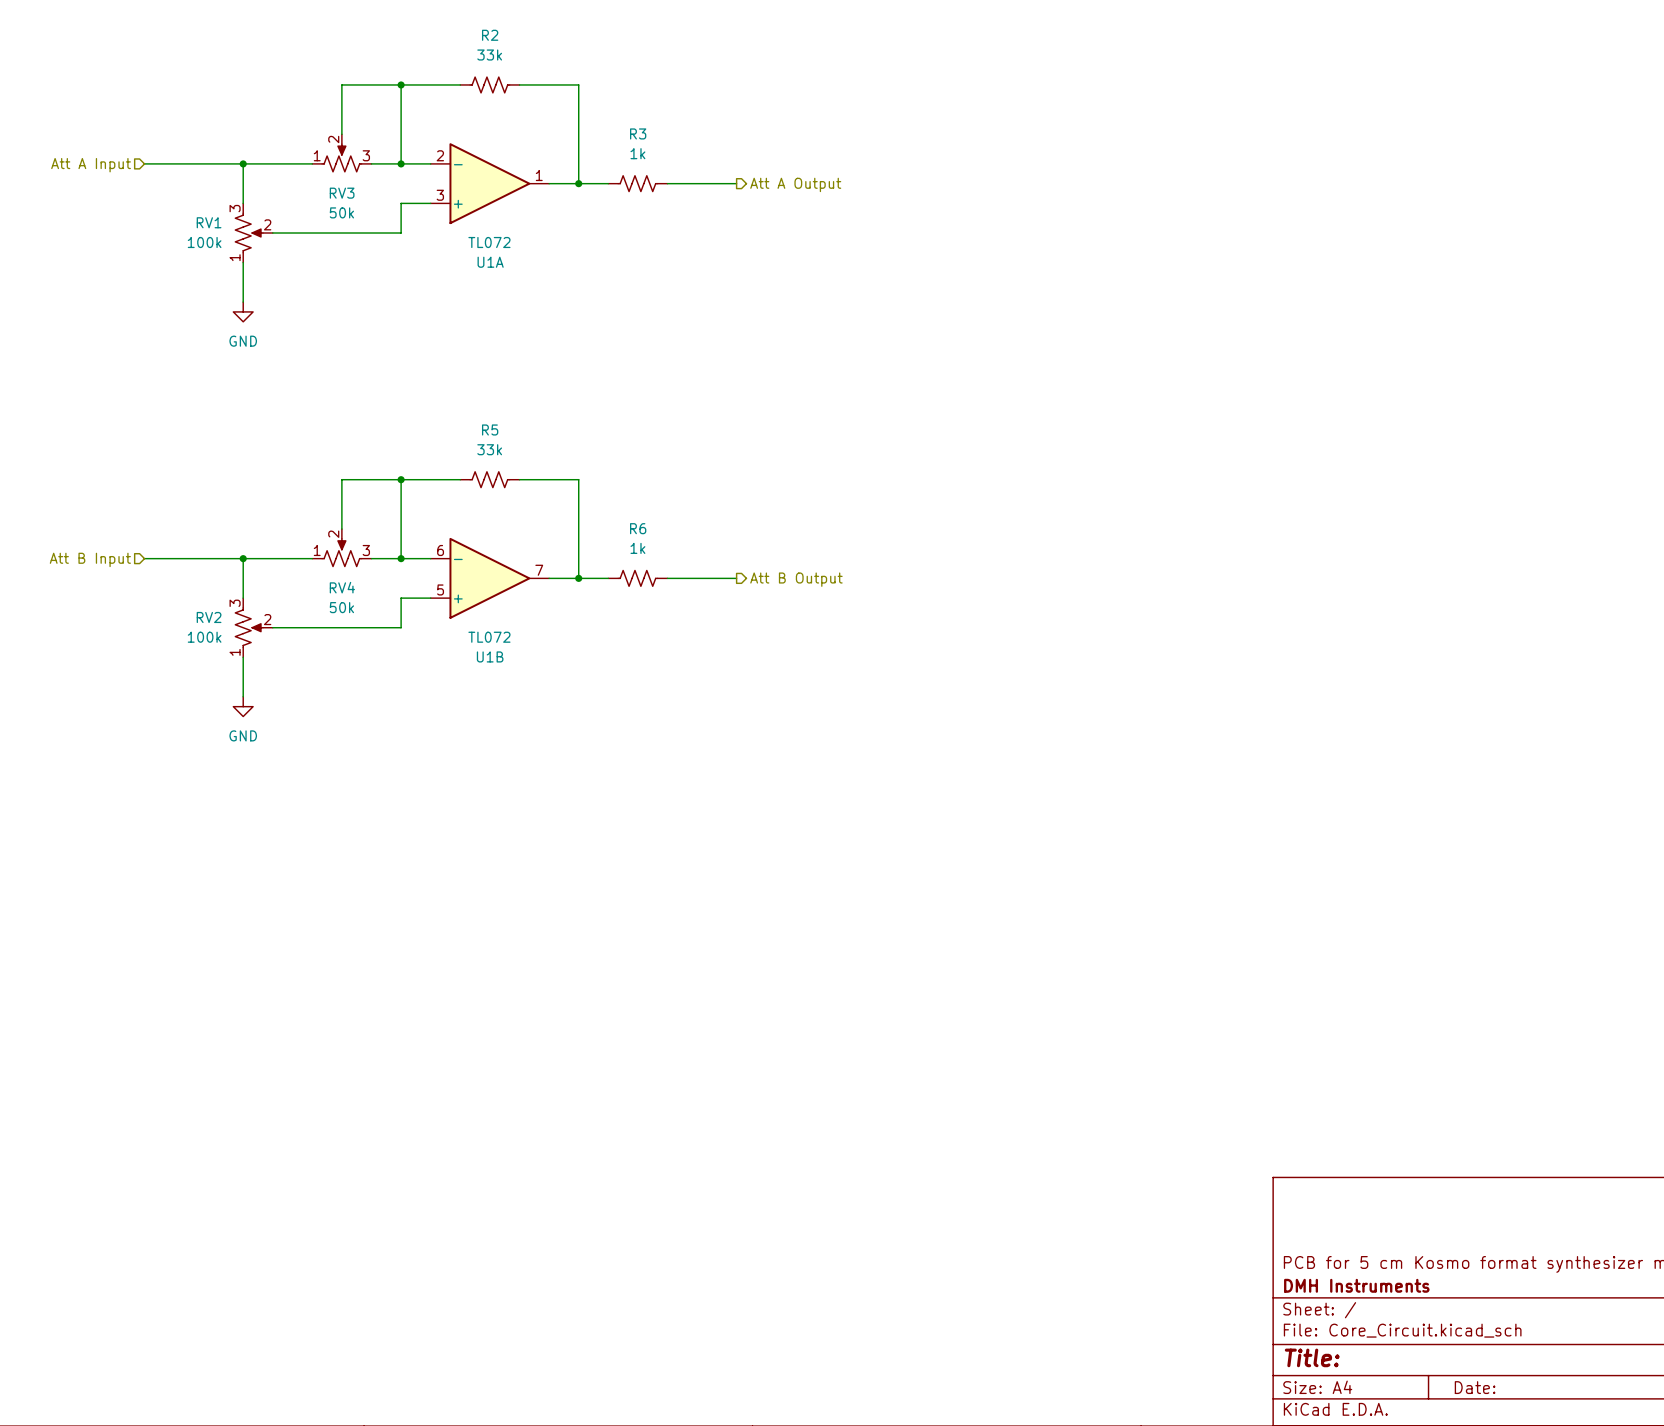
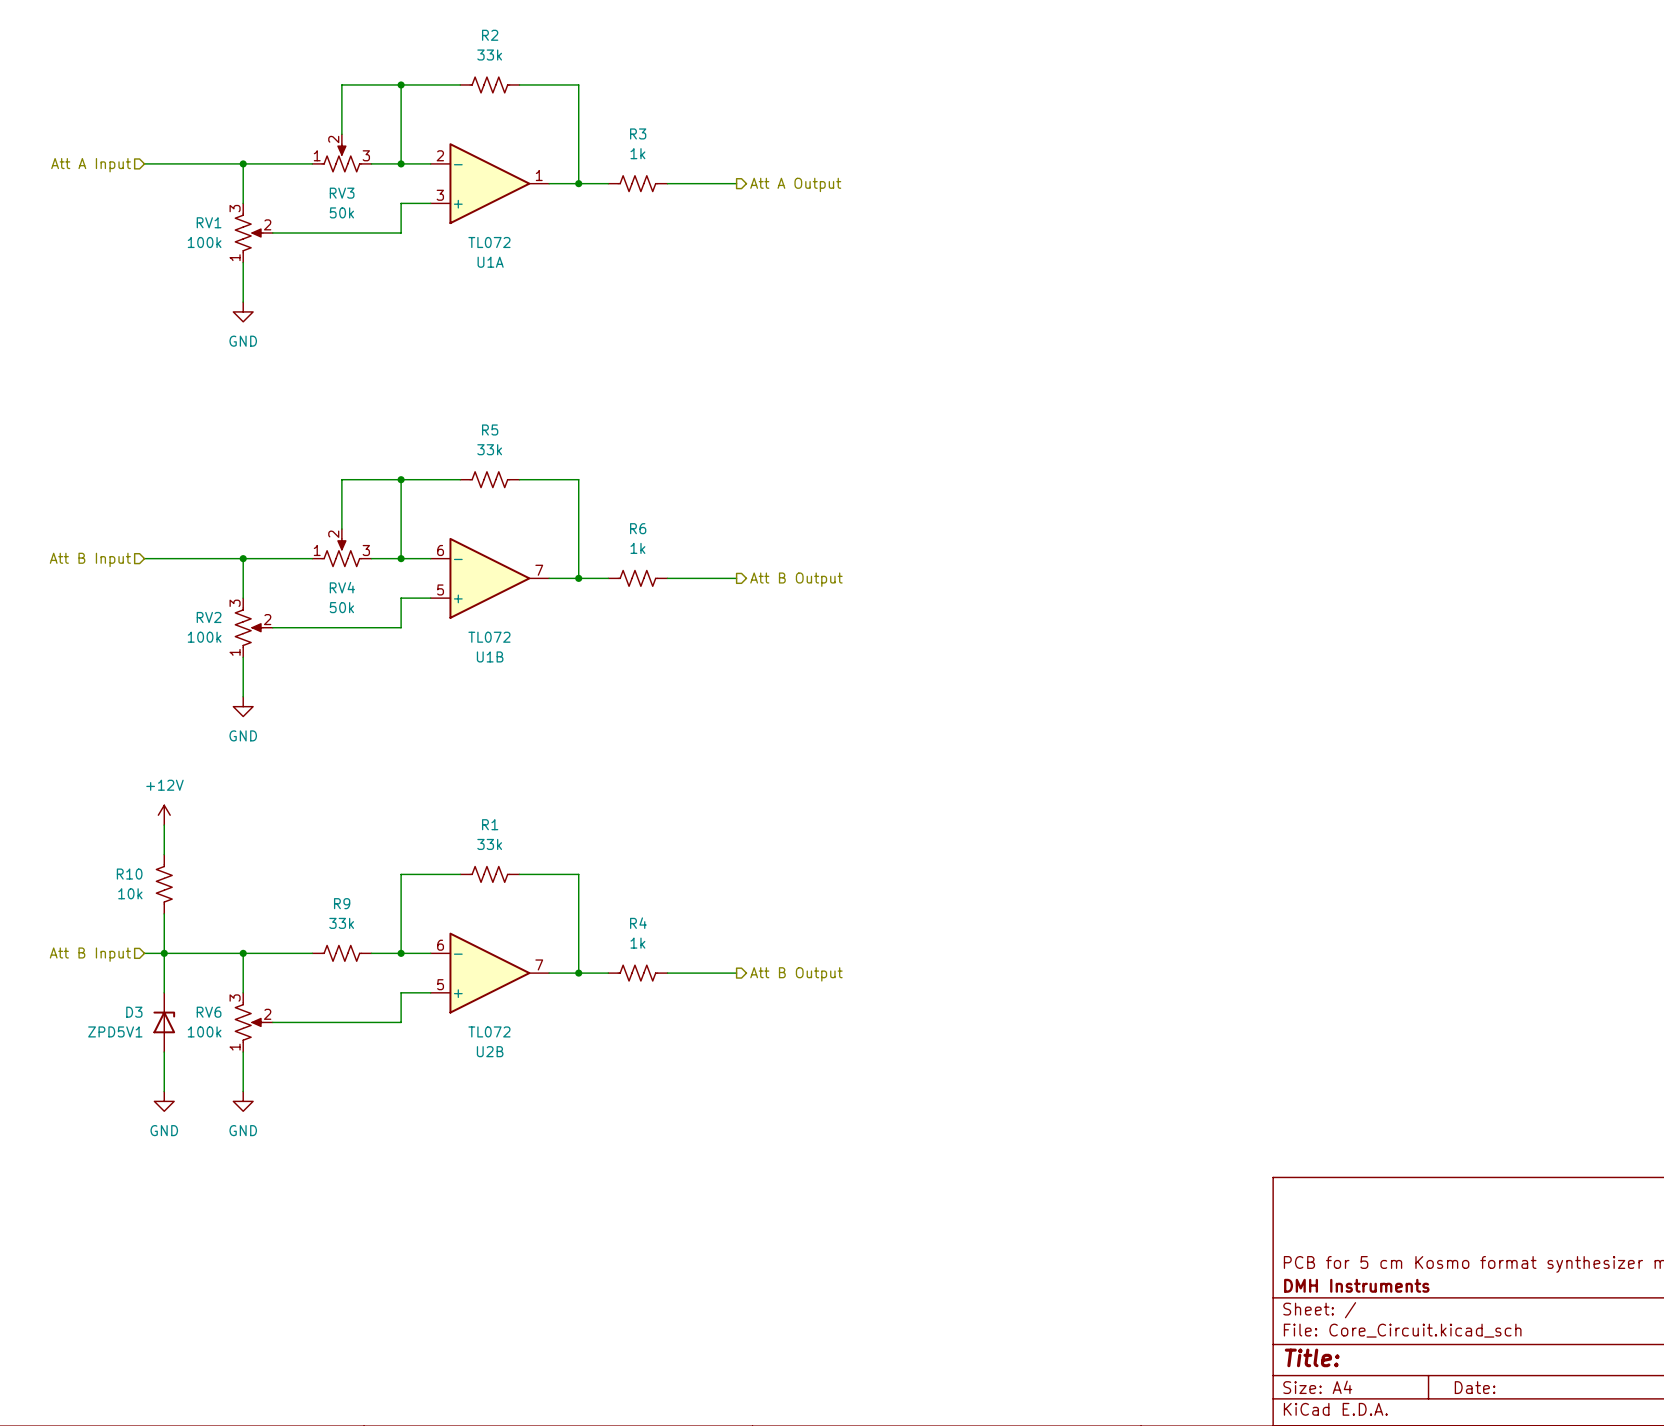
power symbol: none -> +12V (164, 815)
wire: none -> (164, 825) (164, 854)
wire: none -> (460, 874) (401, 874) (401, 953)
R1: none -> 33k (489, 874)
wire: none -> (519, 874) (578, 874) (578, 973)
R10: none -> 10k (164, 884)
wire: none -> (164, 913) (164, 992)
wire: none -> (144, 953) (312, 953)
junction: none -> (164, 953)
wire: none -> (243, 953) (243, 992)
junction: none -> (243, 953)
R9: none -> 33k (341, 953)
wire: none -> (371, 953) (430, 953)
junction: none -> (401, 953)
hierarchical label: none -> Att B Input (90, 954)
U2B: none -> TL072 (489, 973)
wire: none -> (549, 973) (608, 973)
junction: none -> (578, 973)
R4: none -> 1k (637, 973)
wire: none -> (667, 973) (736, 973)
hierarchical label: none -> Att B Output (796, 974)
wire: none -> (430, 992) (401, 992) (401, 1022) (272, 1022)
D3: none -> ZPD5V1 (164, 1022)
RV6: none -> 100k (254, 1022)
wire: none -> (164, 1052) (164, 1091)
wire: none -> (243, 1052) (243, 1091)
power symbol: none -> GND (164, 1101)
power symbol: none -> GND (243, 1101)

